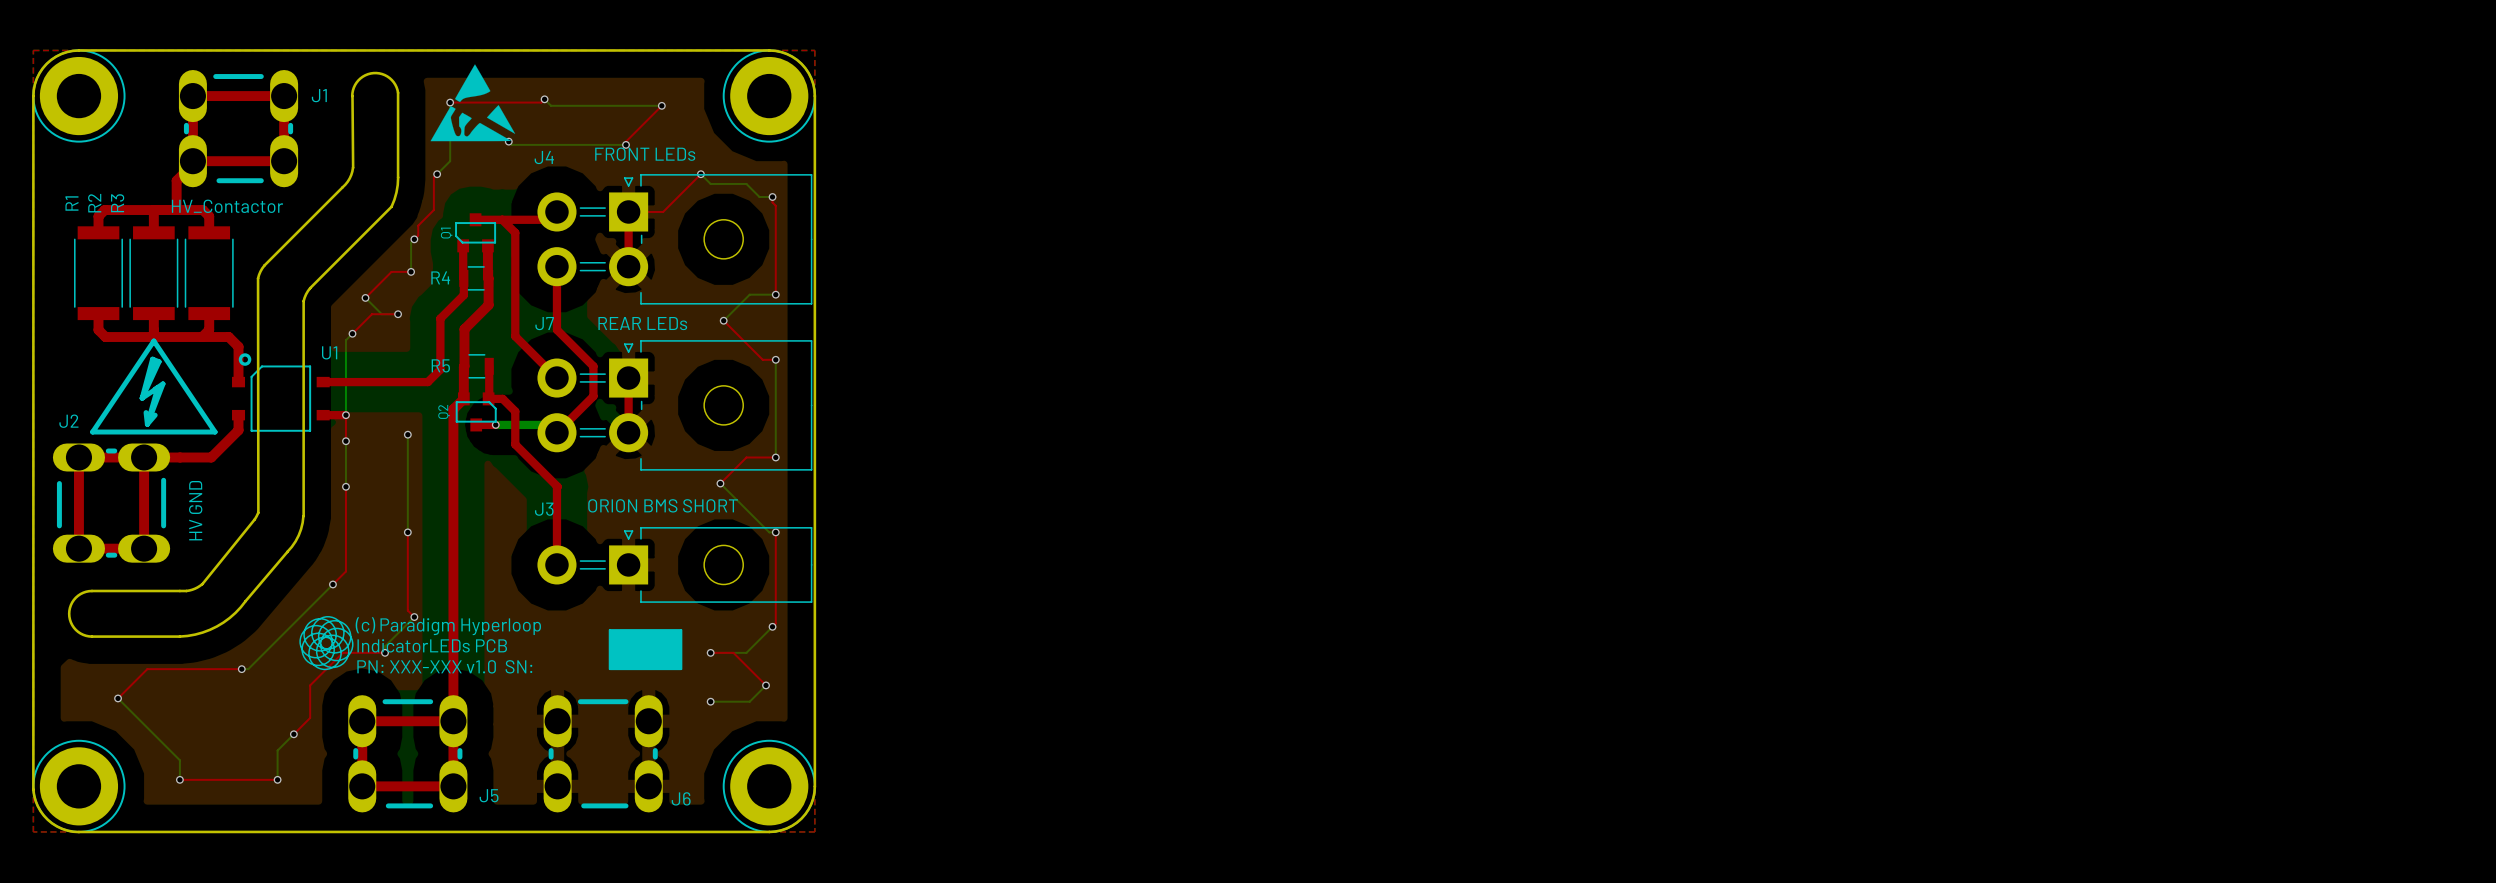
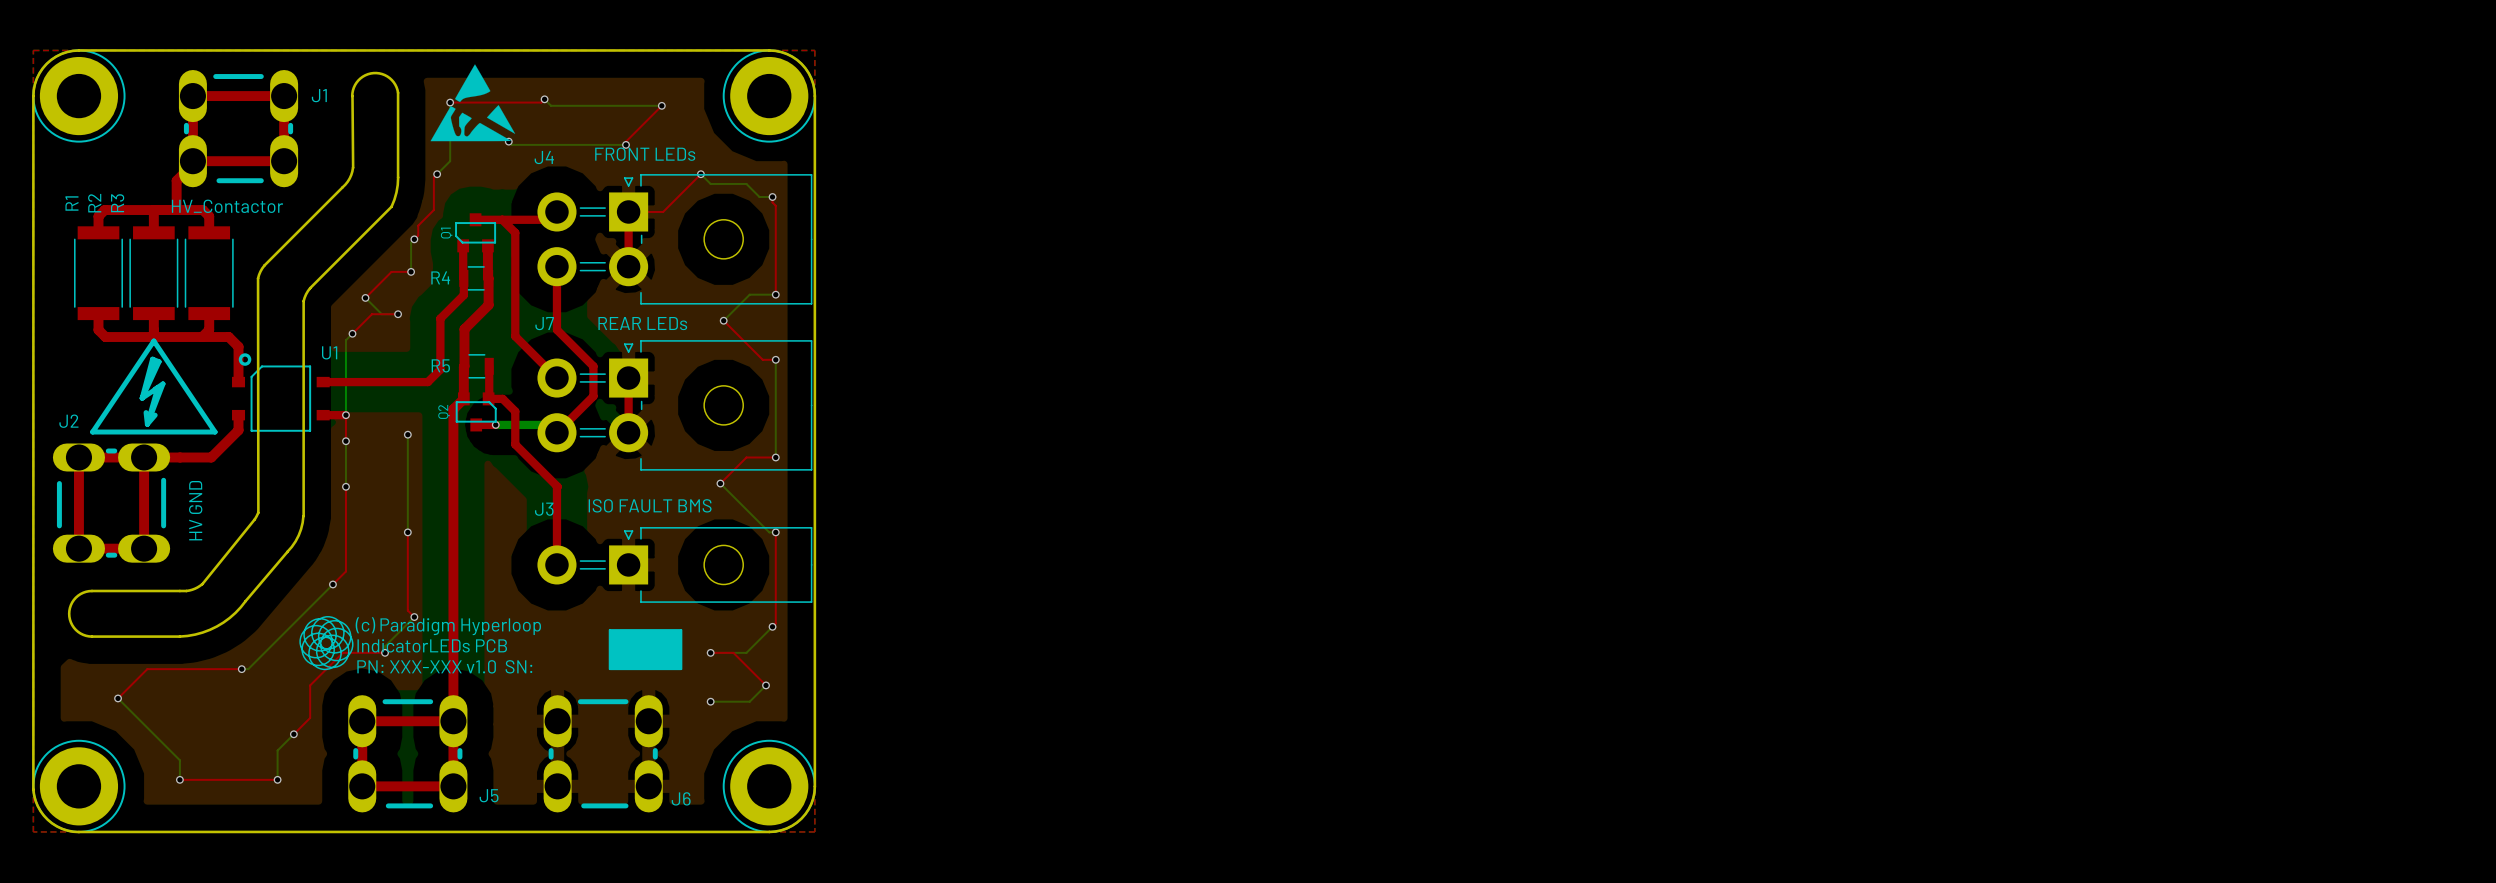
text: ORION BMS SHORT (663, 505) -> ISO FAULT BMS (650, 505)

